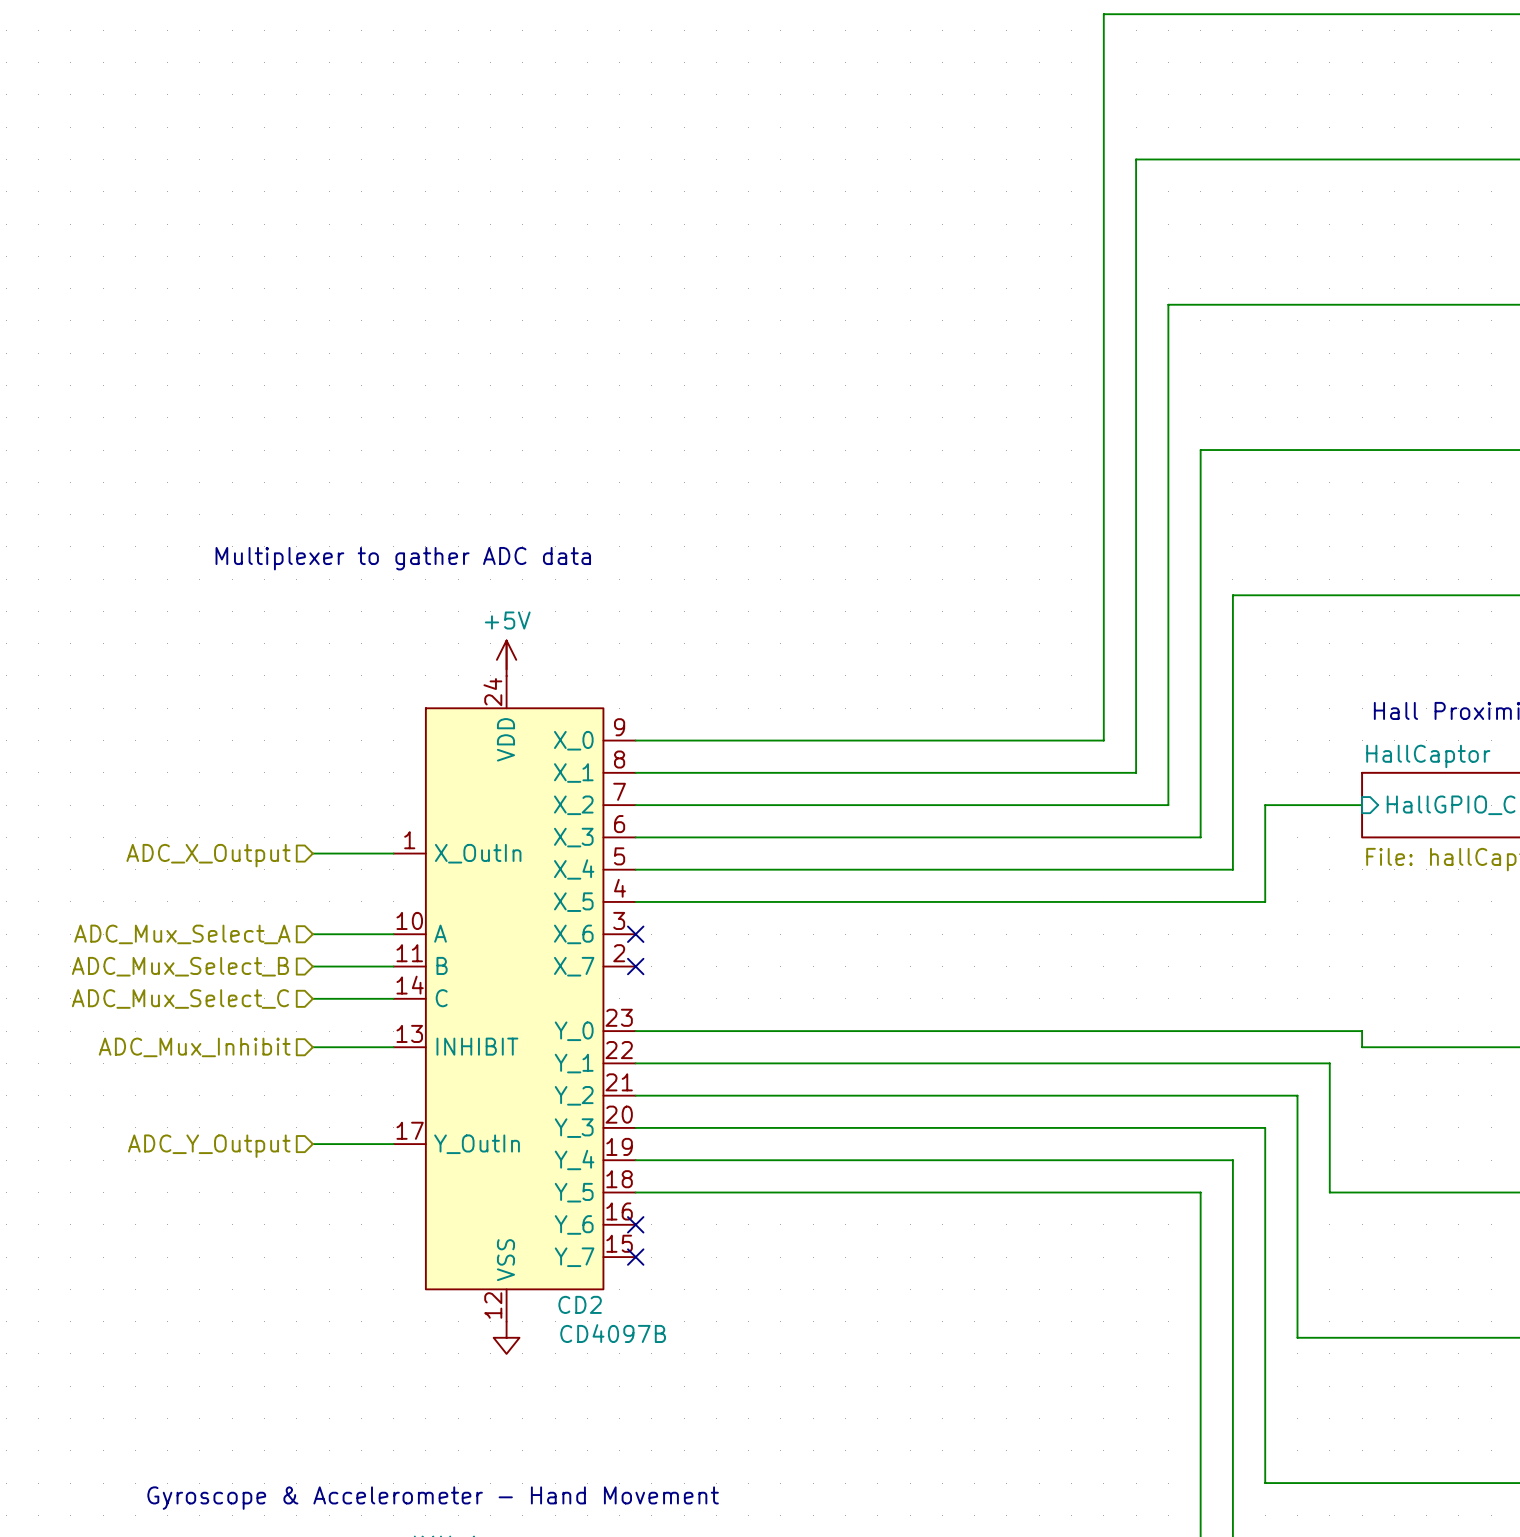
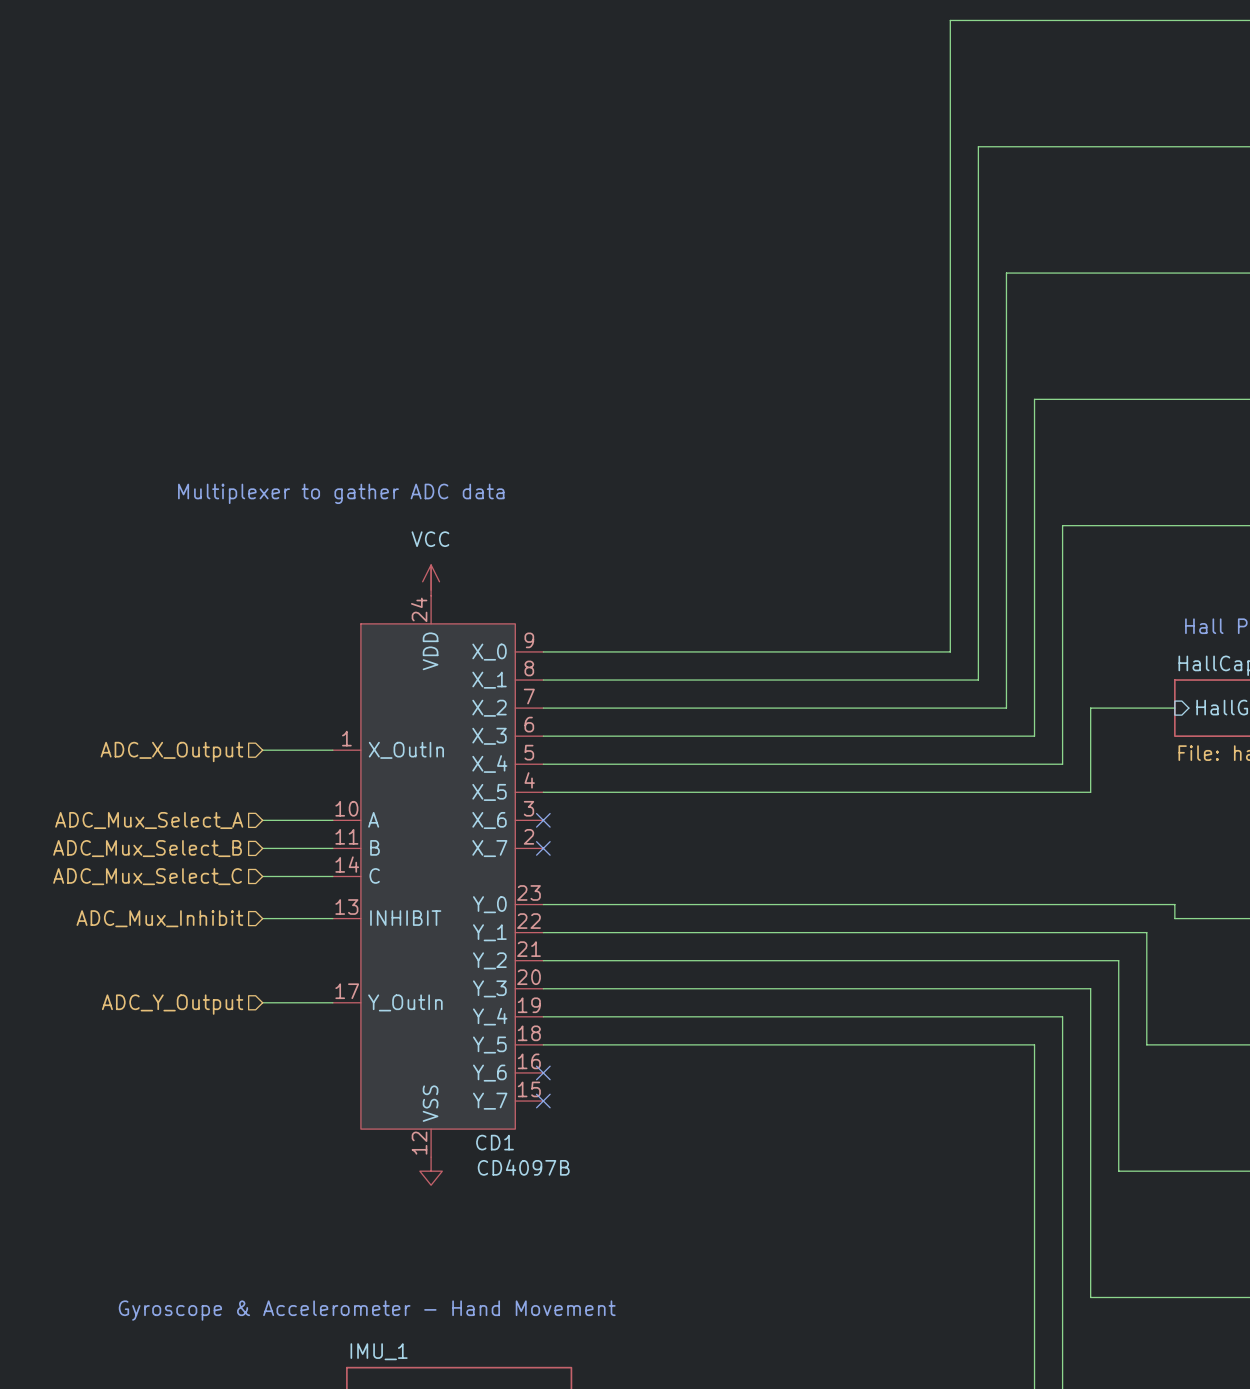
power symbol: +5V (506, 658) -> VCC (431, 580)
CD2 name: CD2 (580, 1304) -> CD1 (495, 1142)

